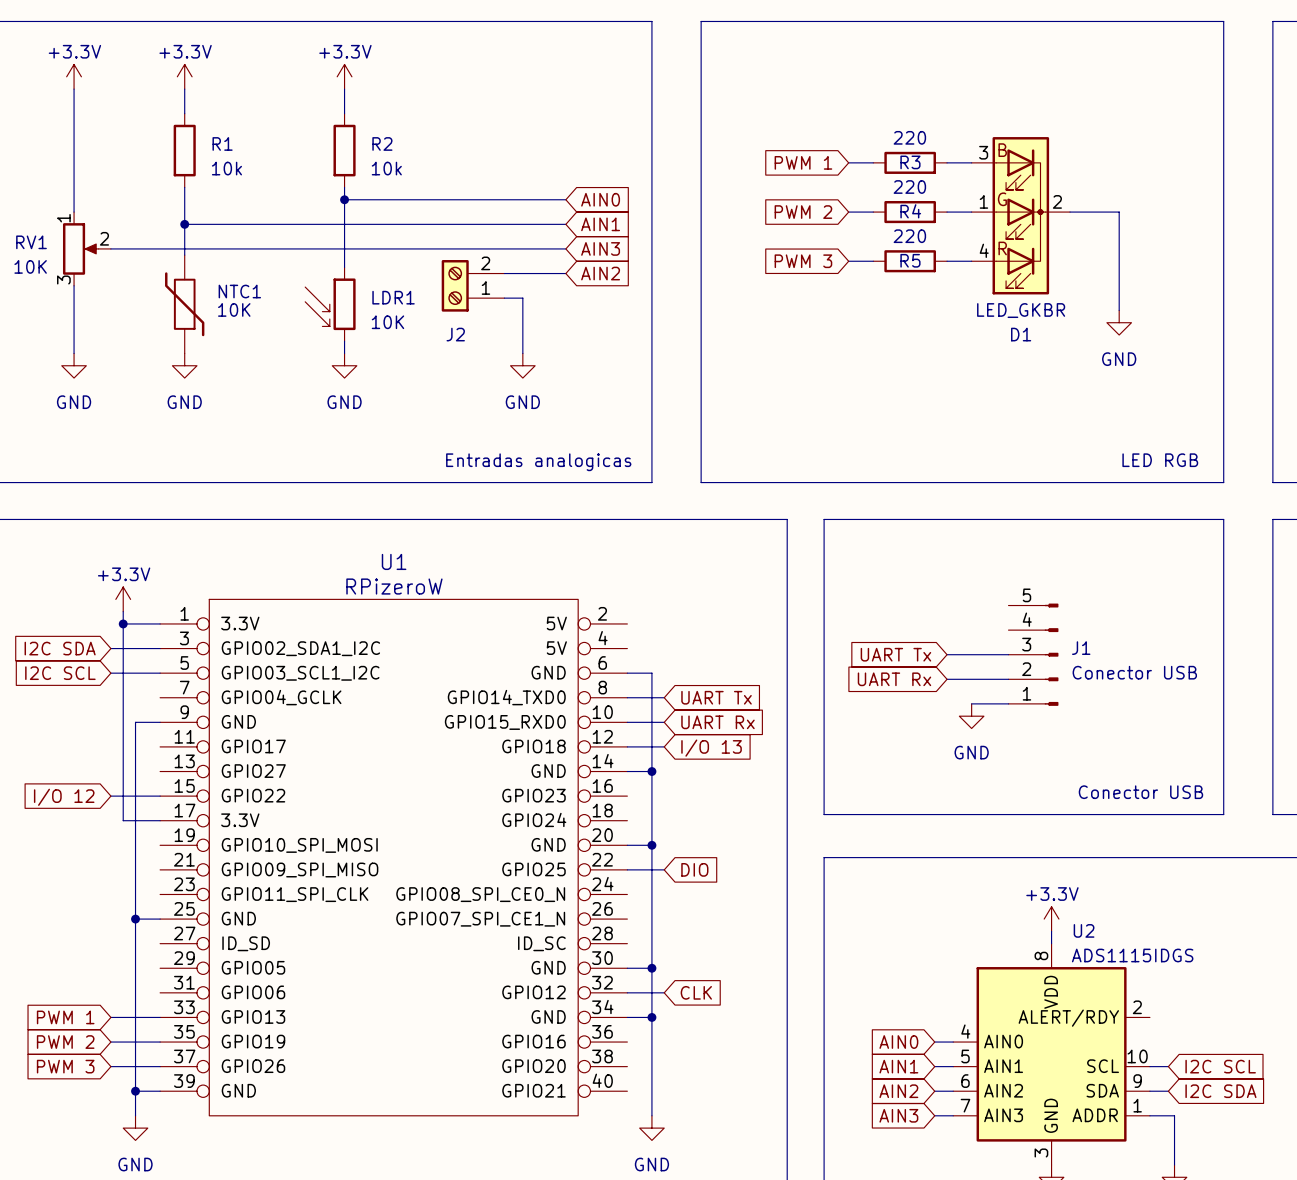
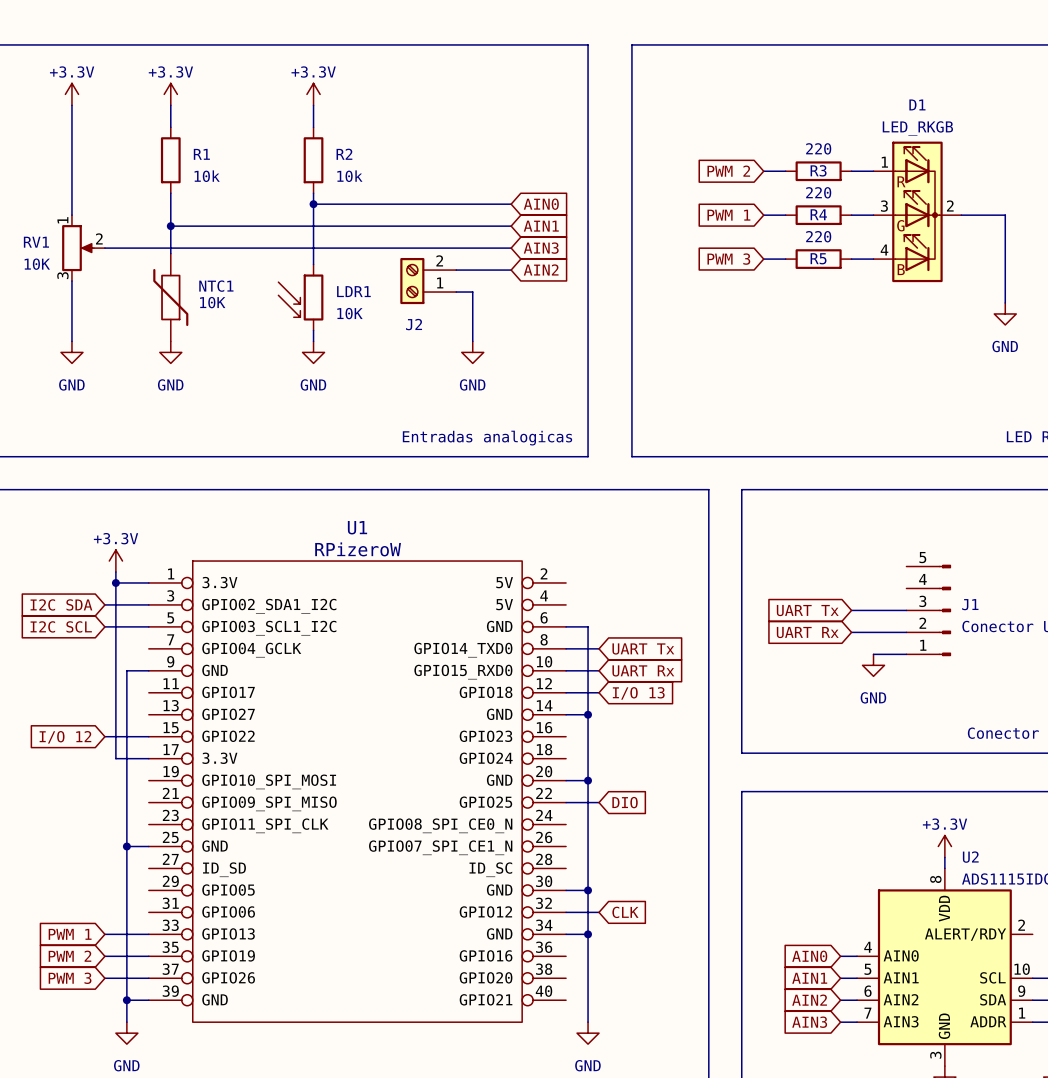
D1 symbol: [971, 137, 1071, 295] -> [873, 141, 962, 283]
global label: PWM 1 (803, 162) -> PWM 2 (728, 171)
global label: PWM 2 (803, 212) -> PWM 1 (728, 215)
D1 value: LED_GKBR (1021, 310) -> LED_RKGB (917, 128)
D1 name position: D1 (1021, 334) -> D1 (917, 104)

